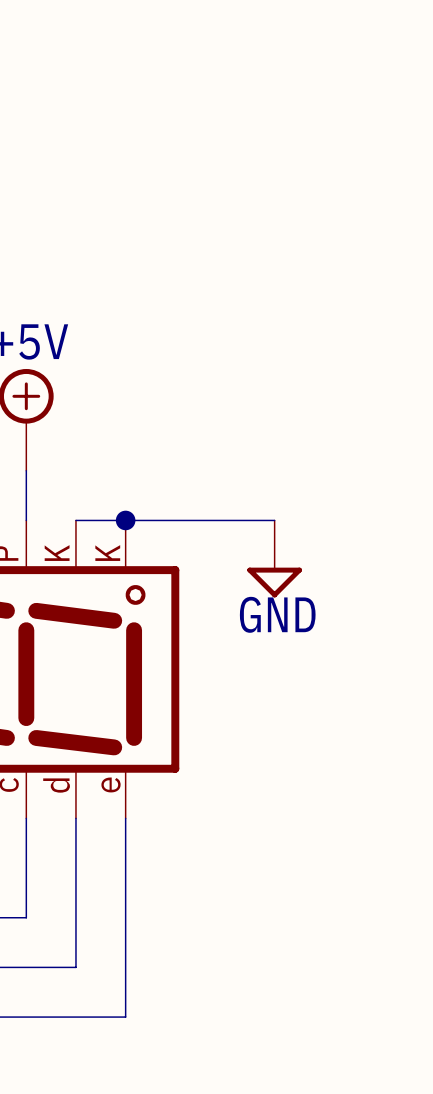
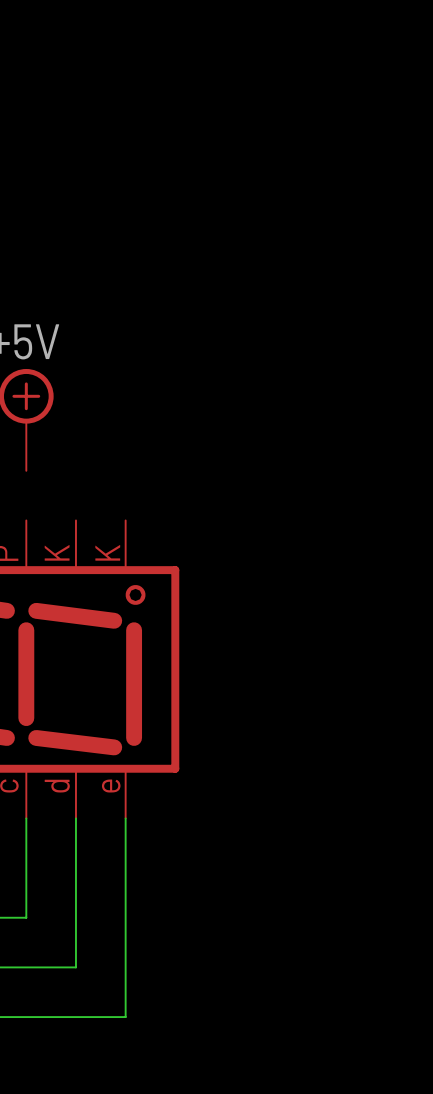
wire: (26, 470) (26, 520) -> none
wire: (75, 520) (274, 520) -> none
junction: (125, 520) -> none
power symbol: GND (274, 558) -> none

